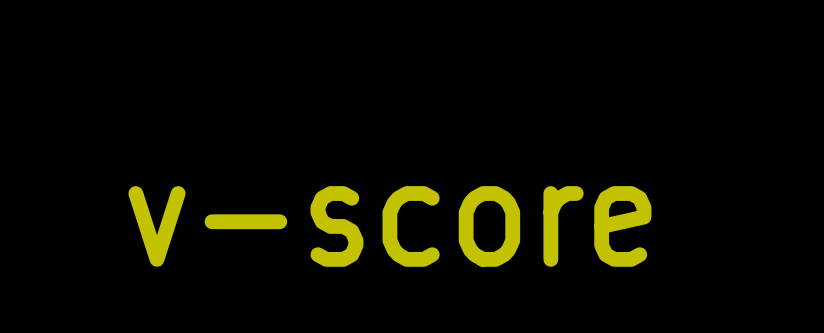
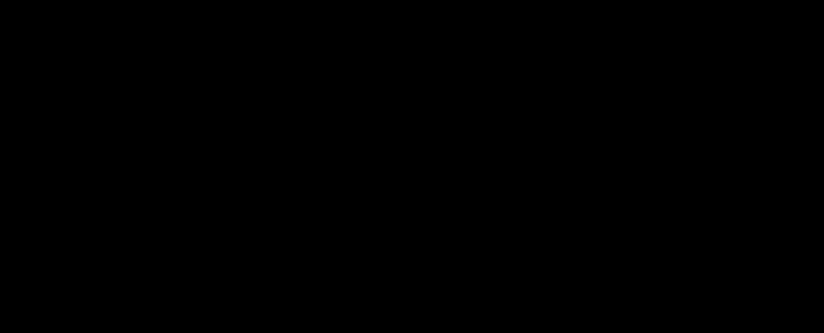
text: v-score (389, 226) -> none

